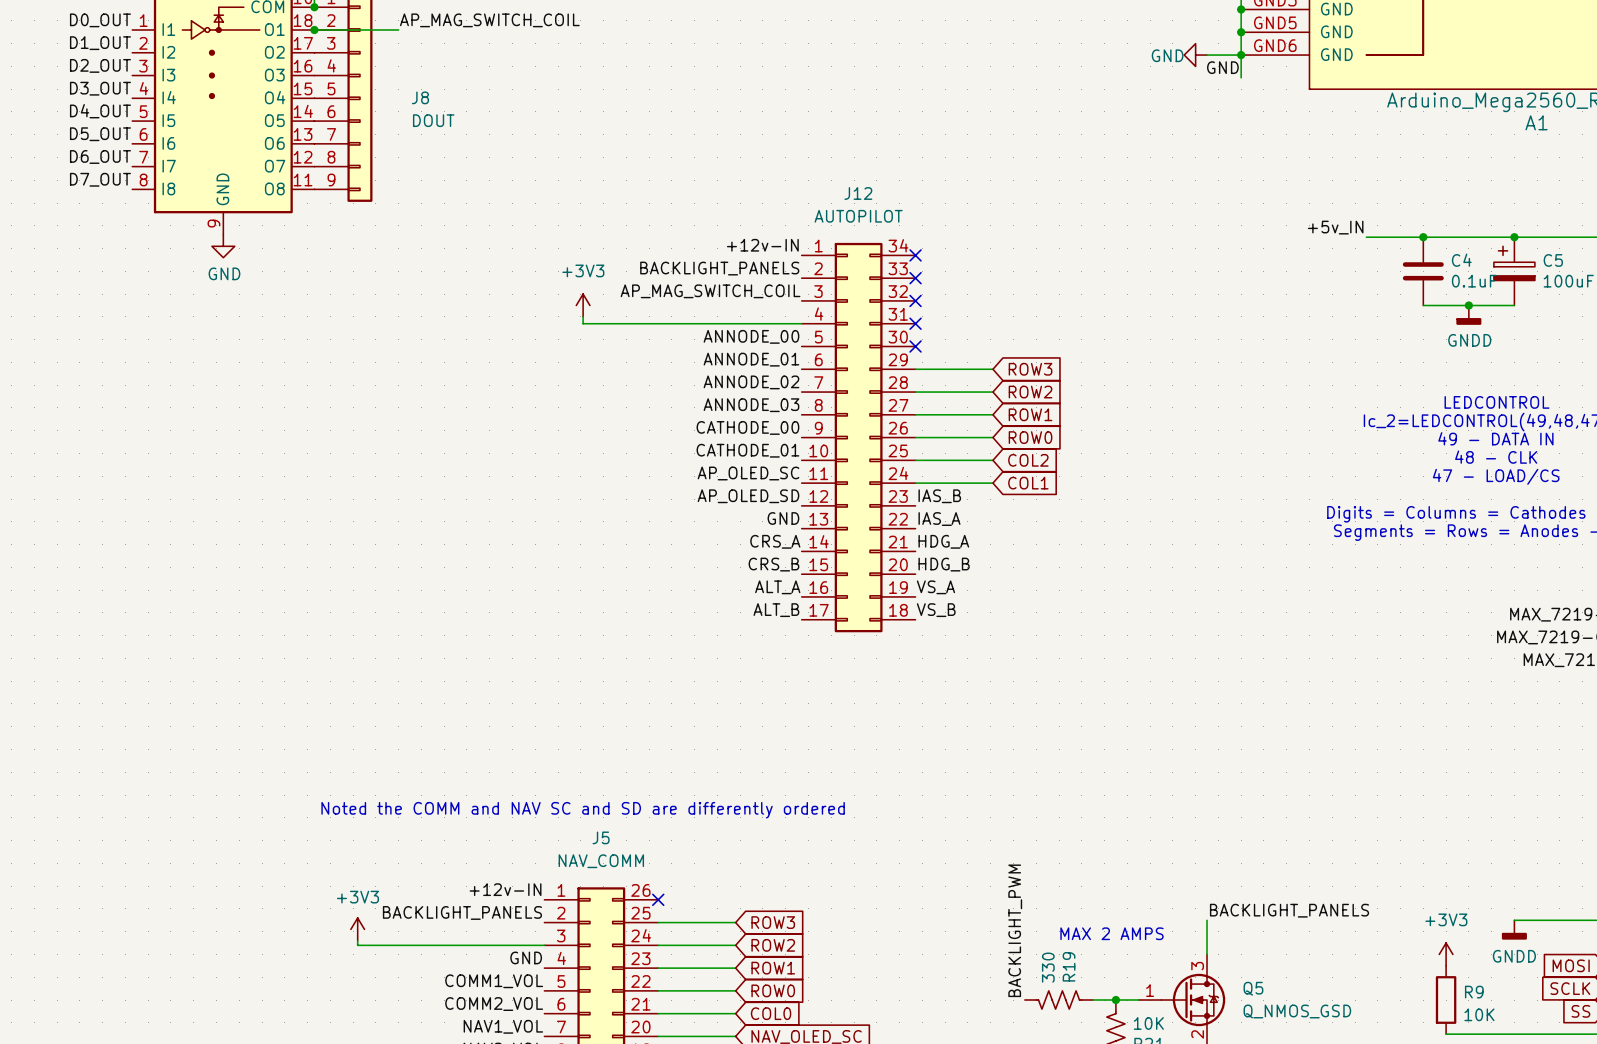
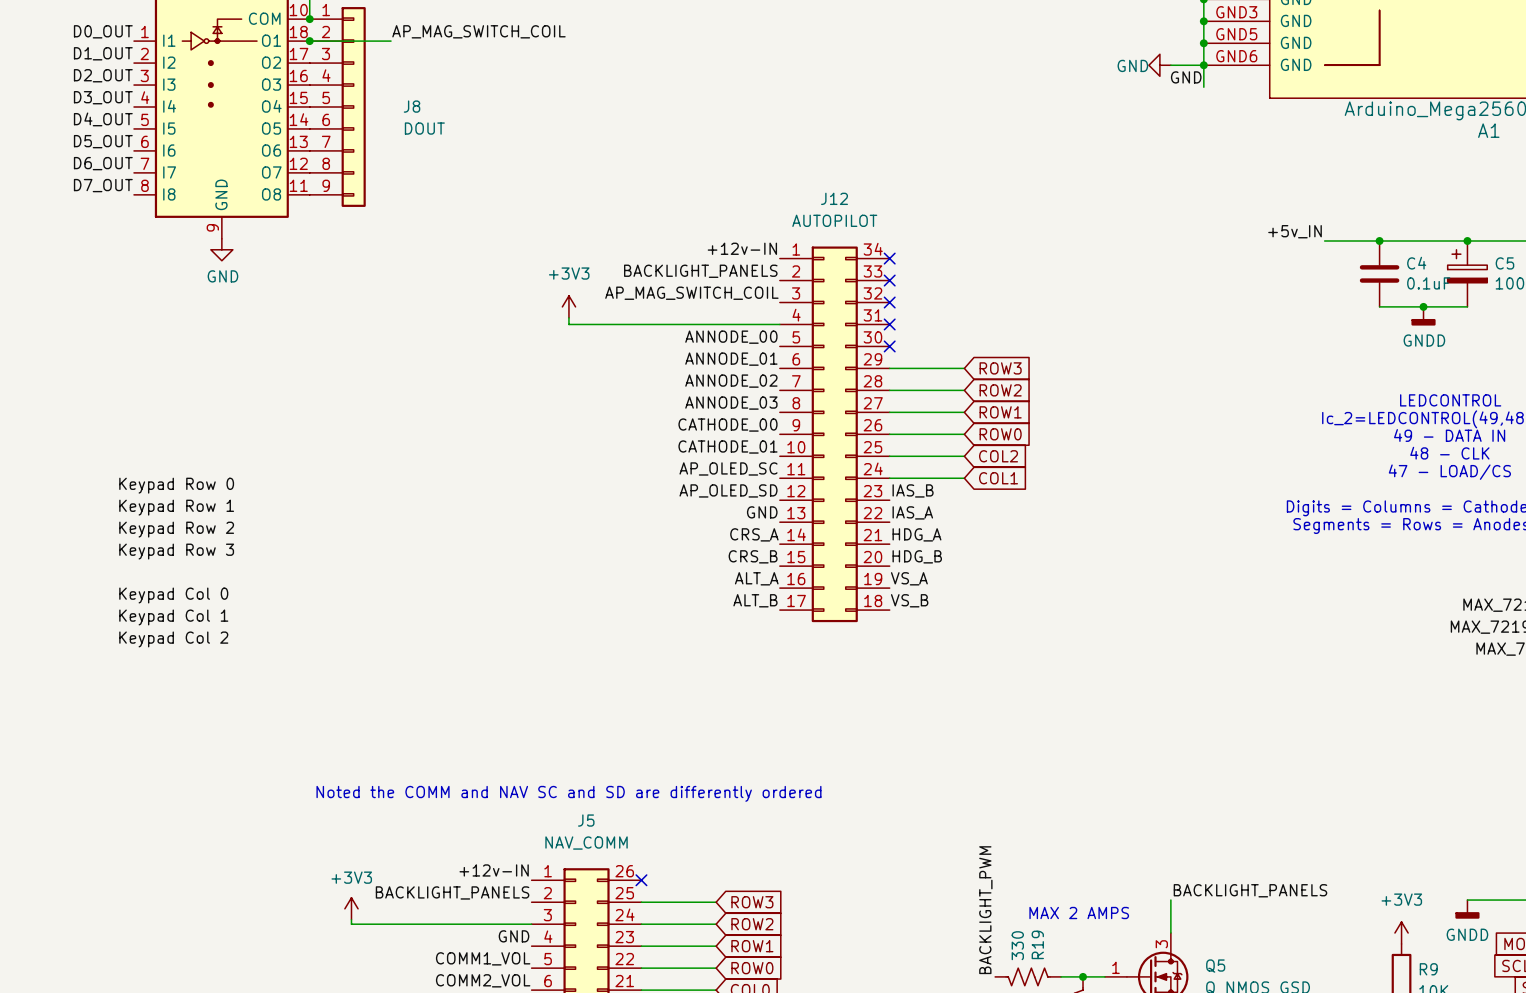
label: none -> Keypad Row 0 (176, 485)
label: none -> Keypad Row 1 (176, 507)
label: none -> Keypad Row 2 (176, 529)
label: none -> Keypad Row 3 (176, 551)
label: none -> Keypad Col 0 (173, 595)
label: none -> Keypad Col 1 (173, 617)
label: none -> Keypad Col 2 (173, 639)

